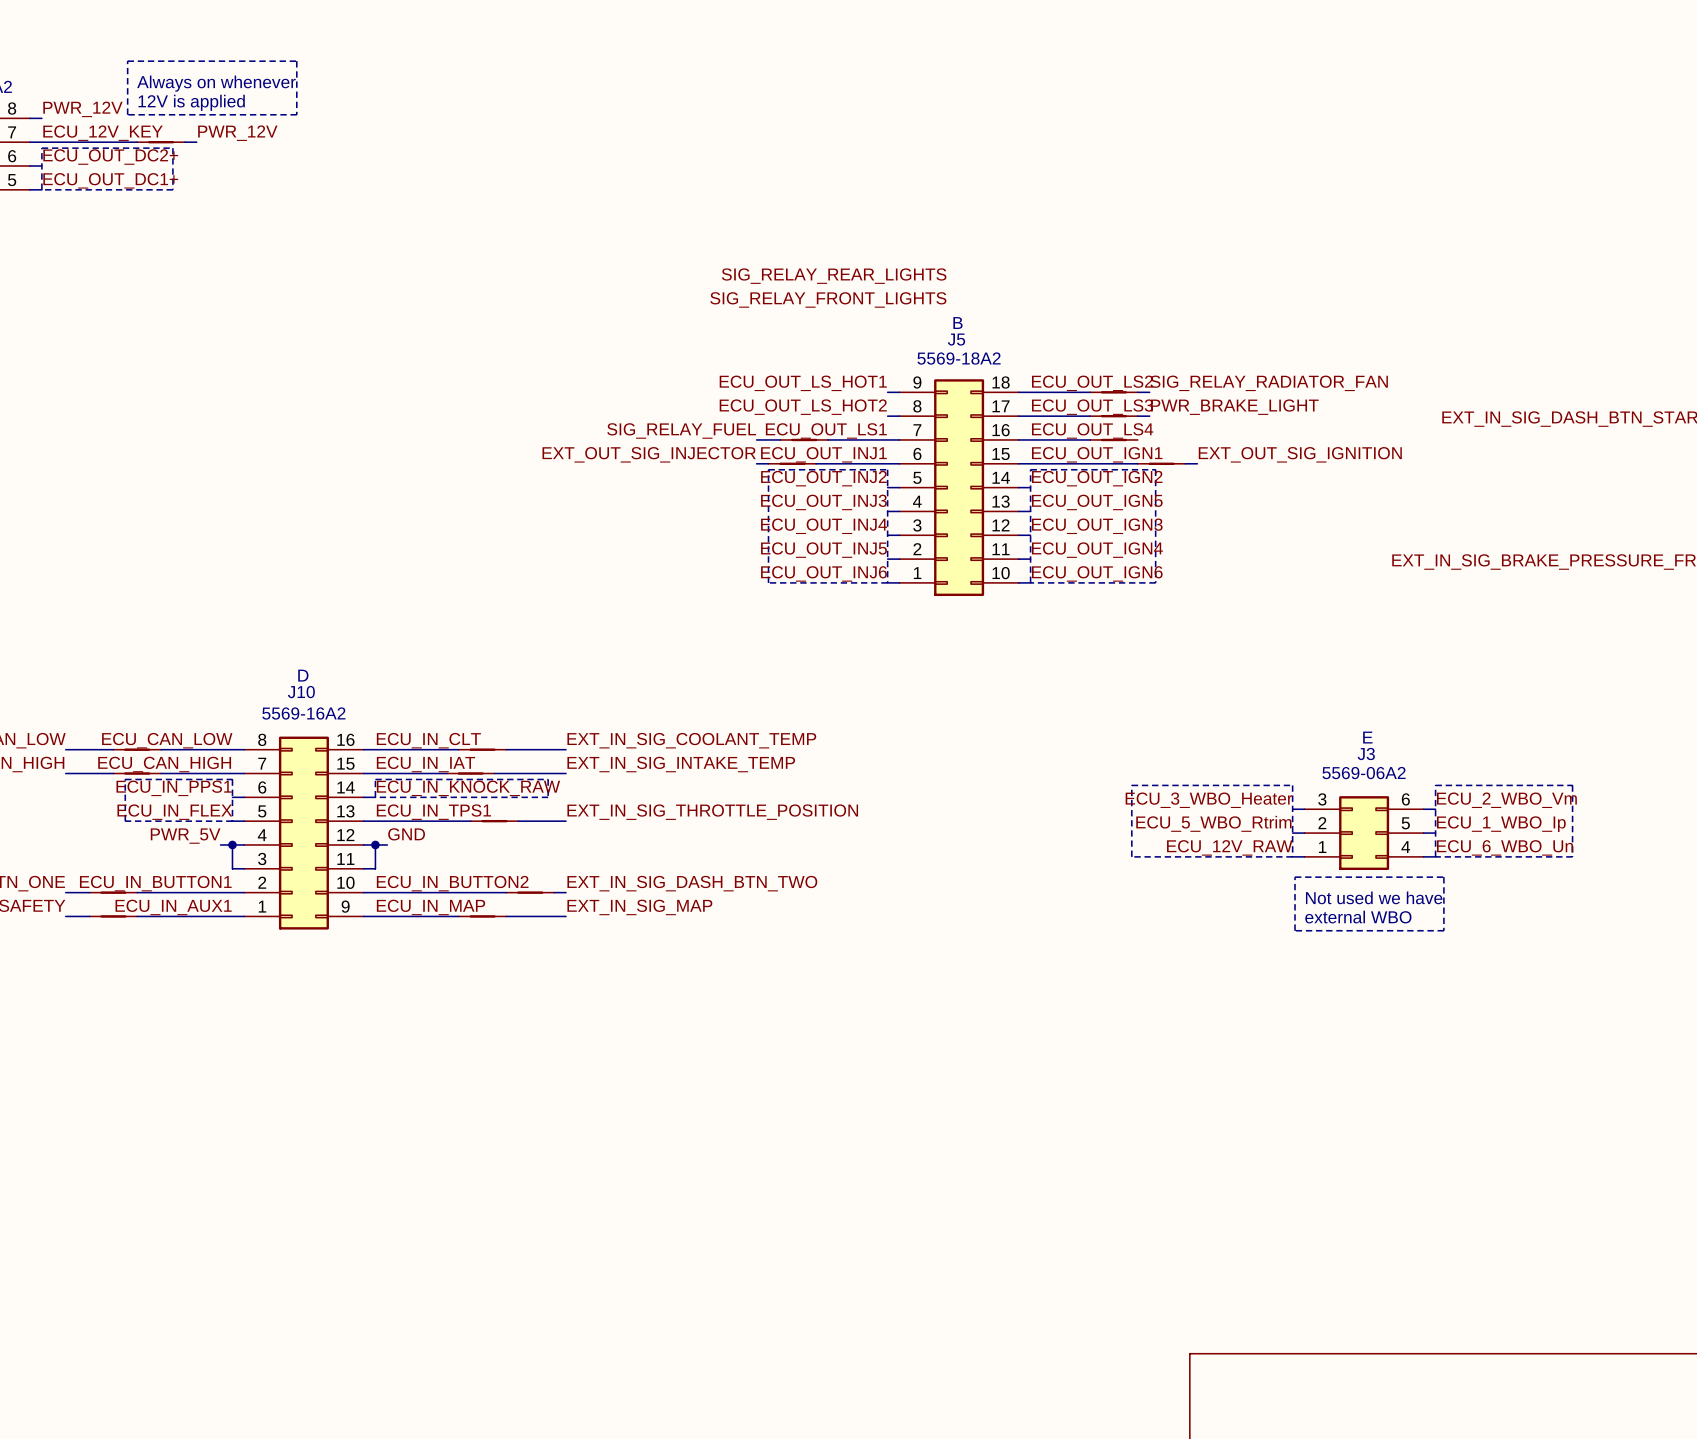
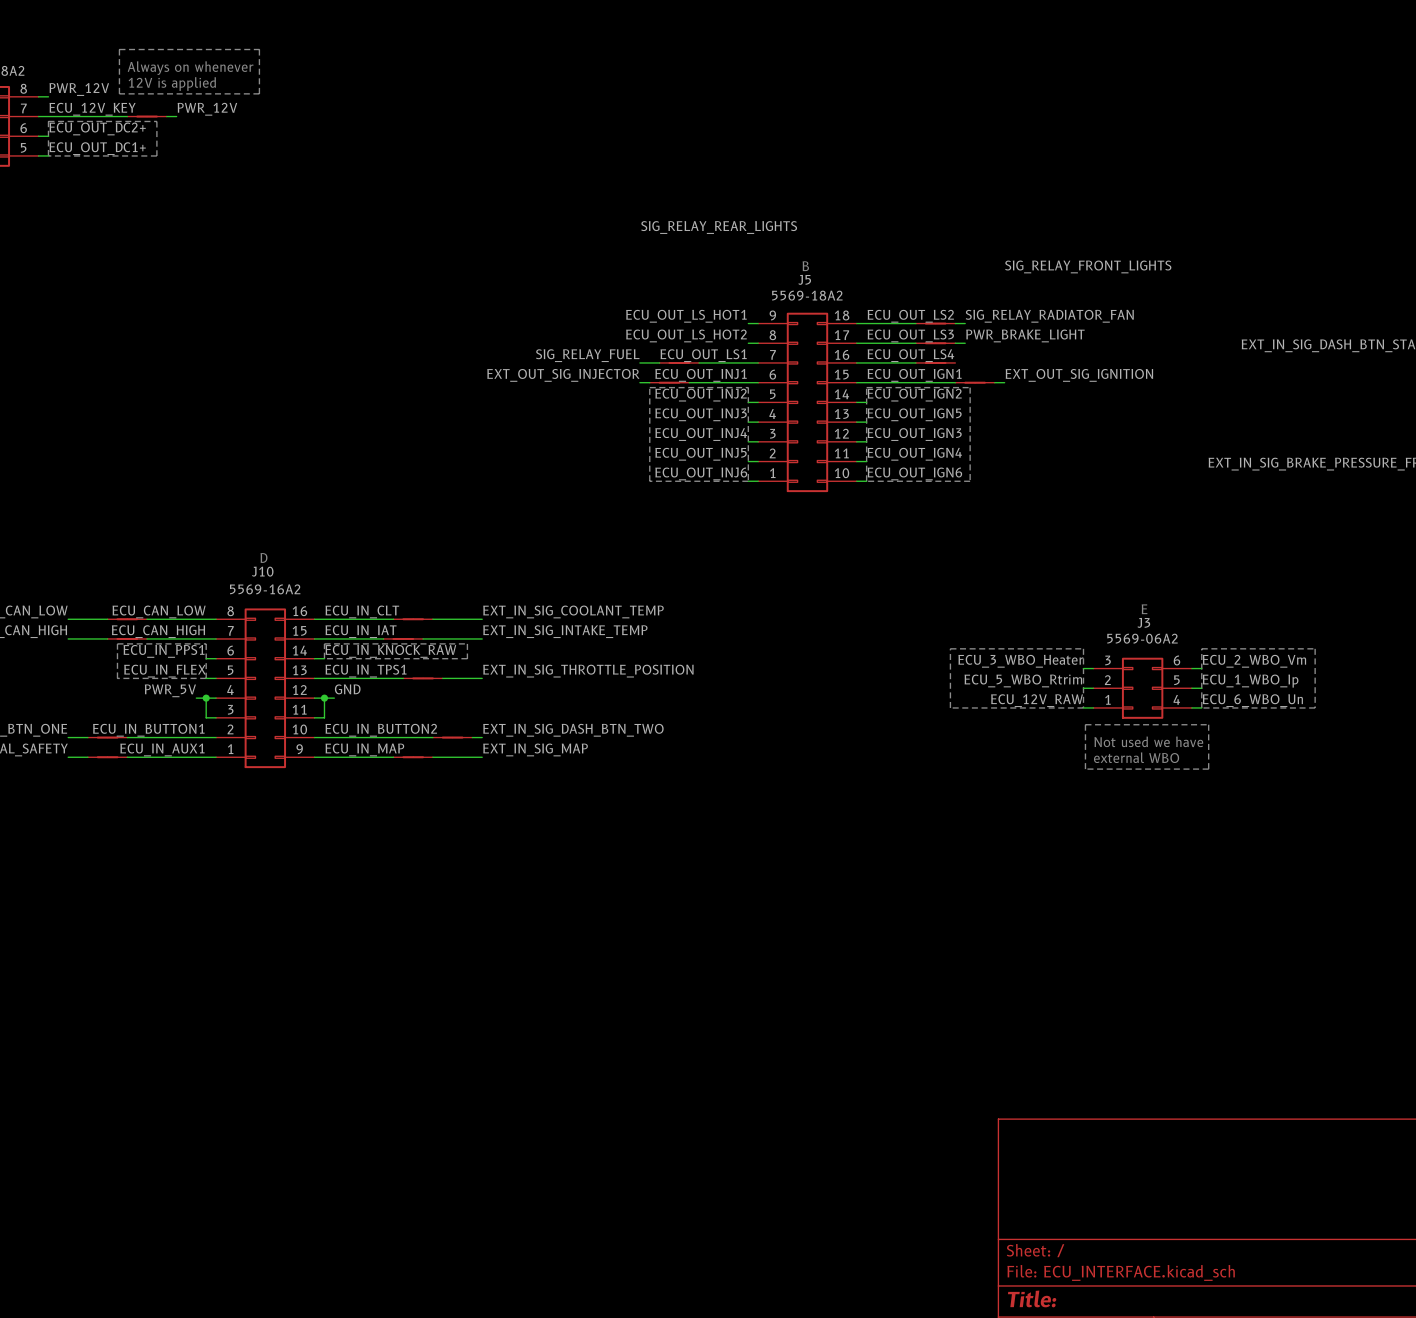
label: SIG_RELAY_FRONT_LIGHTS (828, 299) -> none
label: none -> SIG_RELAY_FRONT_LIGHTS (1088, 266)

